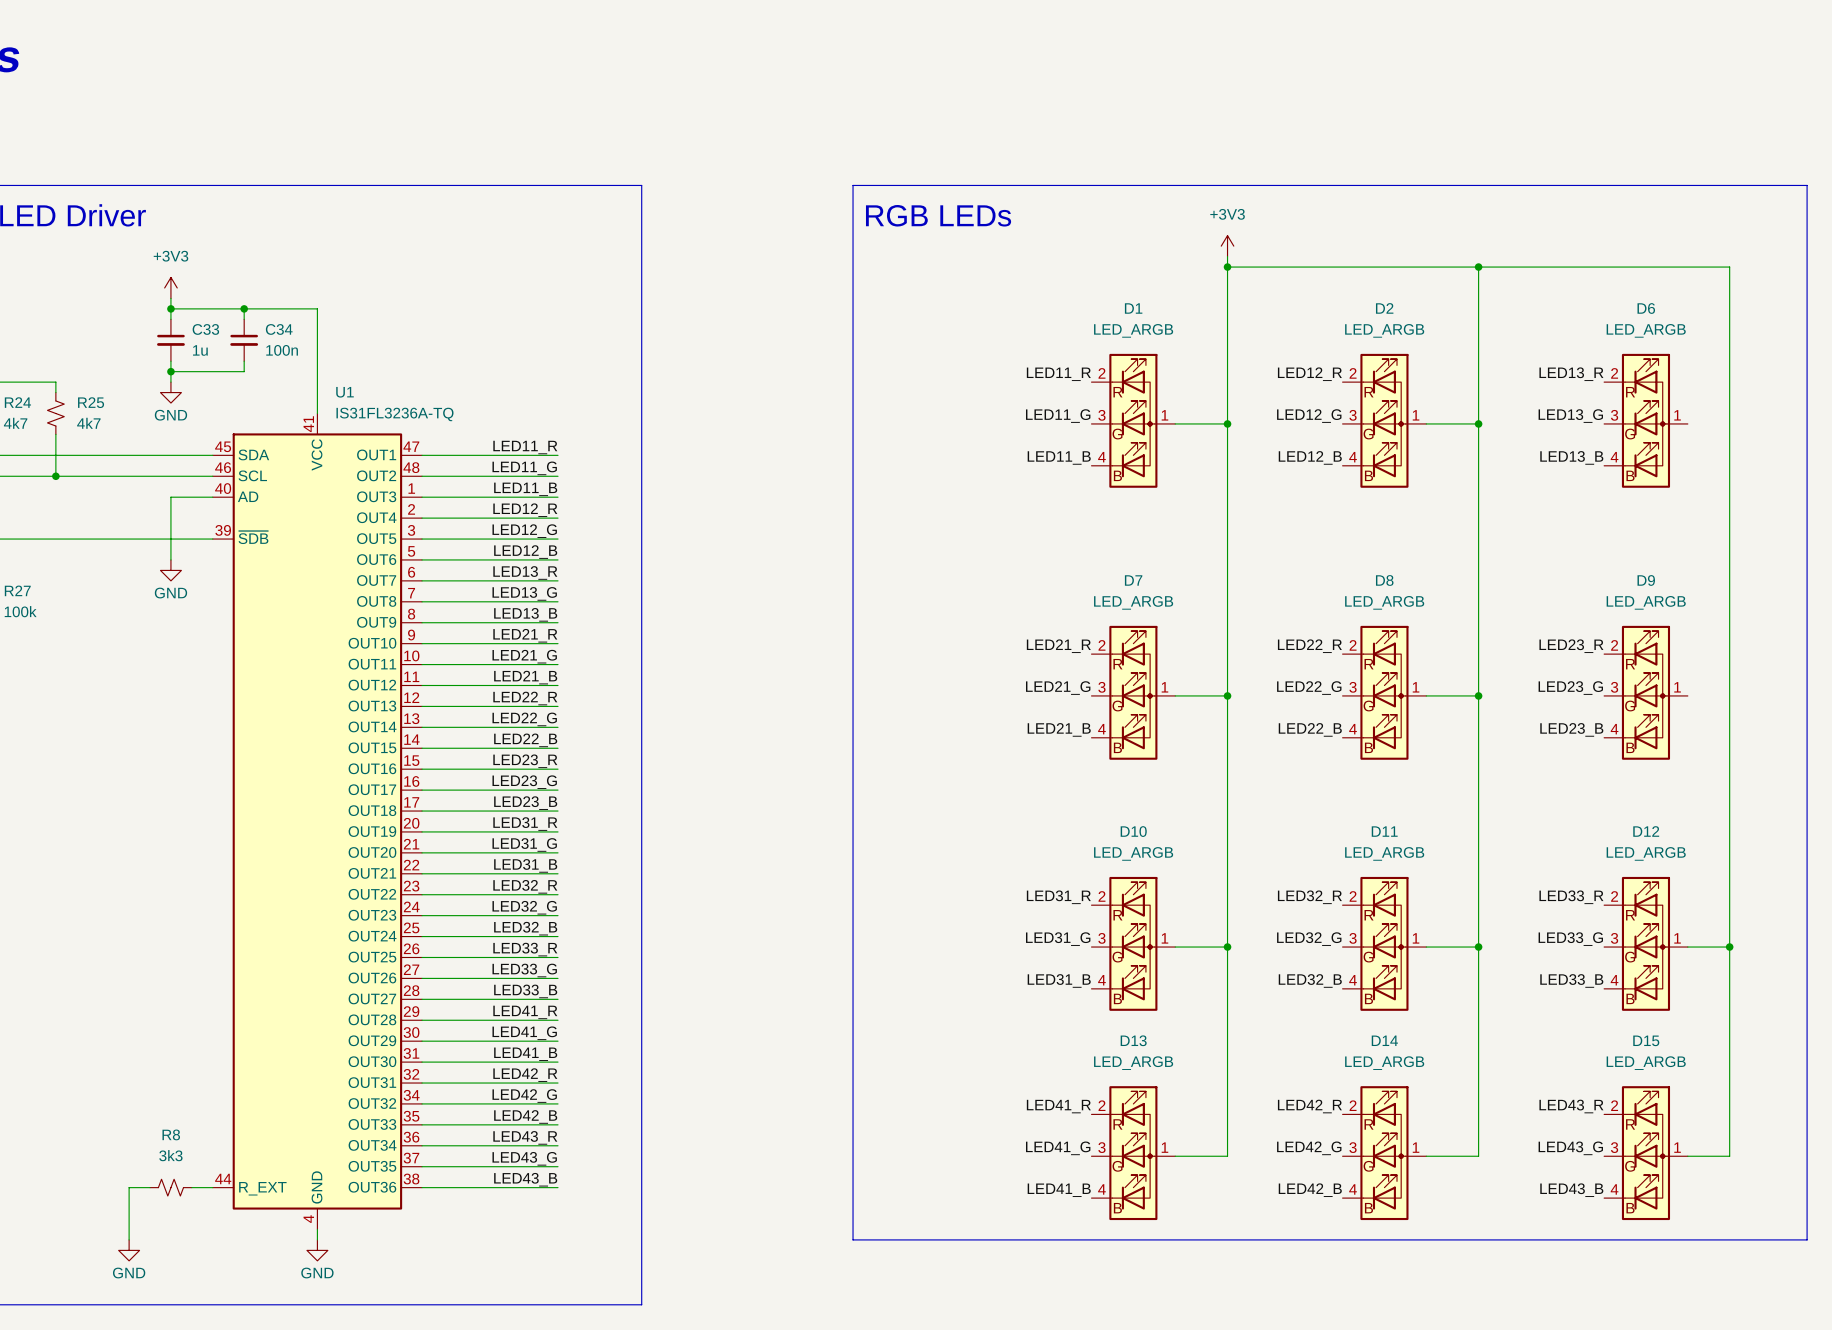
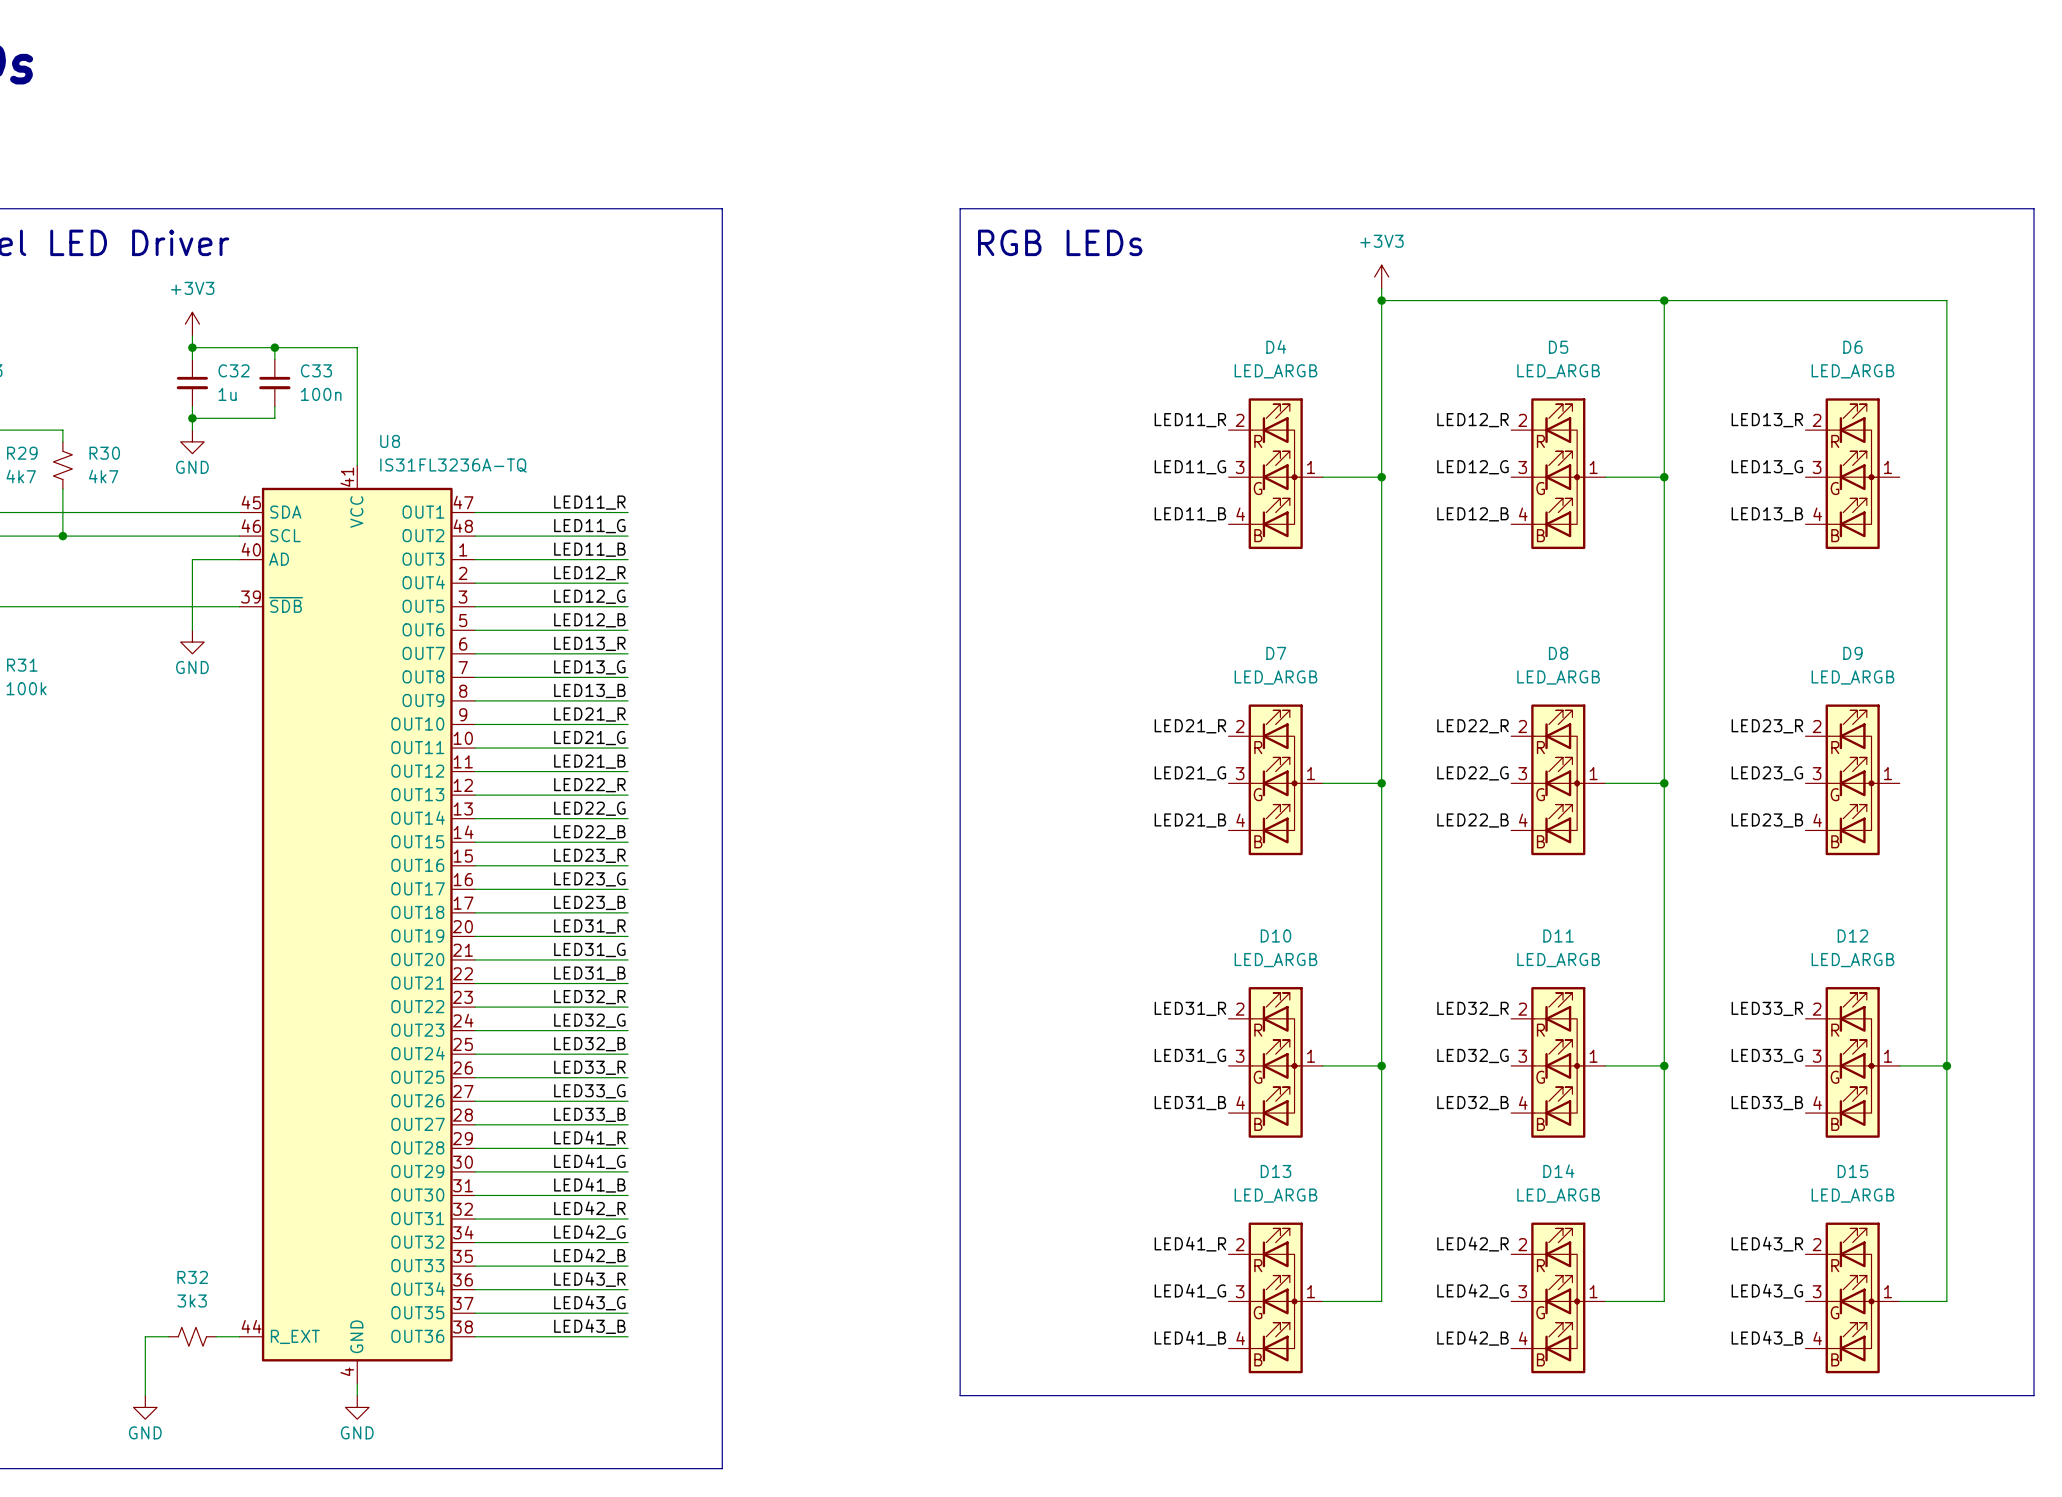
D1 name: D1 (1133, 308) -> D4 (1276, 346)
D2 name: D2 (1384, 308) -> D5 (1558, 347)
C33 name: C33 (205, 329) -> C32 (234, 370)
C34 name: C34 (279, 329) -> C33 (316, 370)
U1 name: U1 (345, 392) -> U8 (390, 441)
R24 name: R24 (17, 402) -> R29 (22, 453)
R25 name: R25 (91, 402) -> R30 (104, 453)
R27 name: R27 (17, 590) -> R31 (22, 665)
R8 name: R8 (171, 1134) -> R32 (192, 1277)

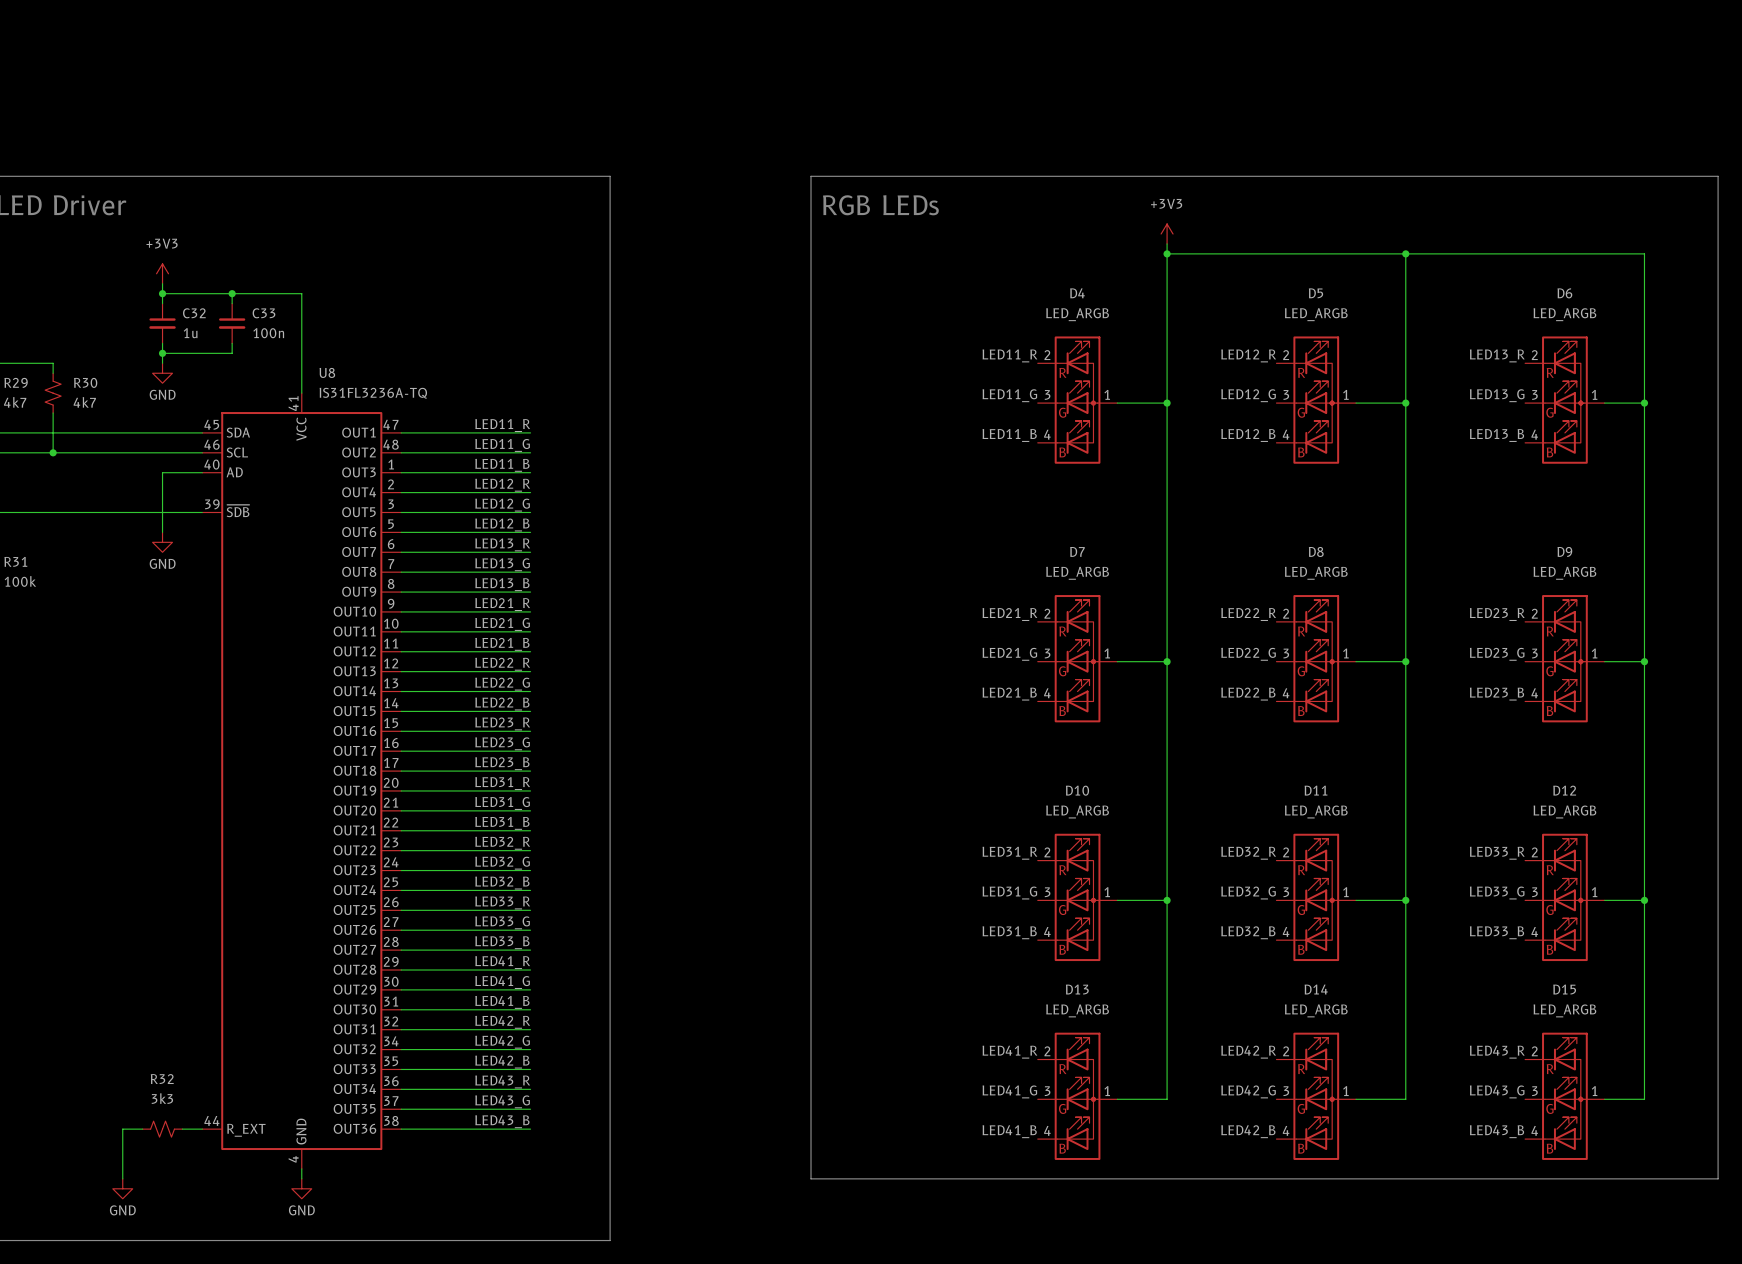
wire: none -> (1604, 403) (1644, 403)
junction: none -> (1644, 403)
wire: none -> (1604, 661) (1644, 661)
junction: none -> (1644, 661)

